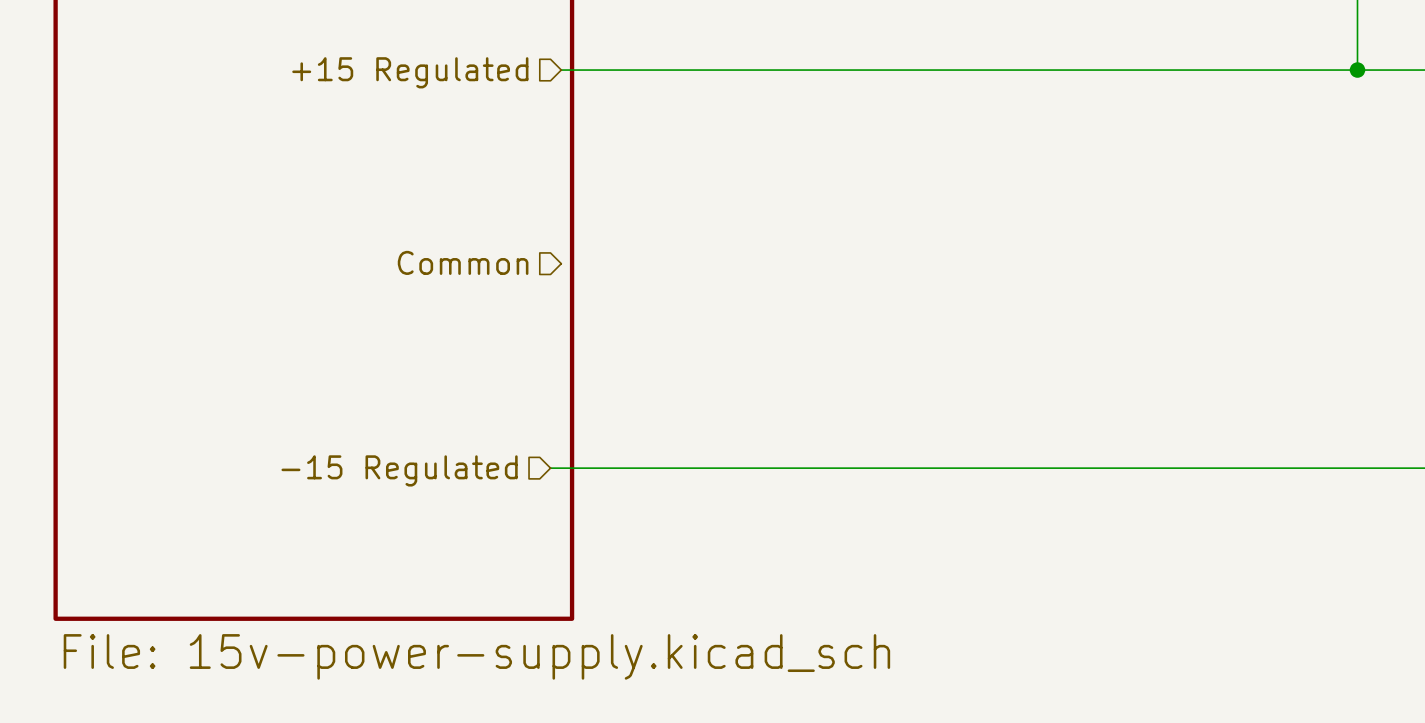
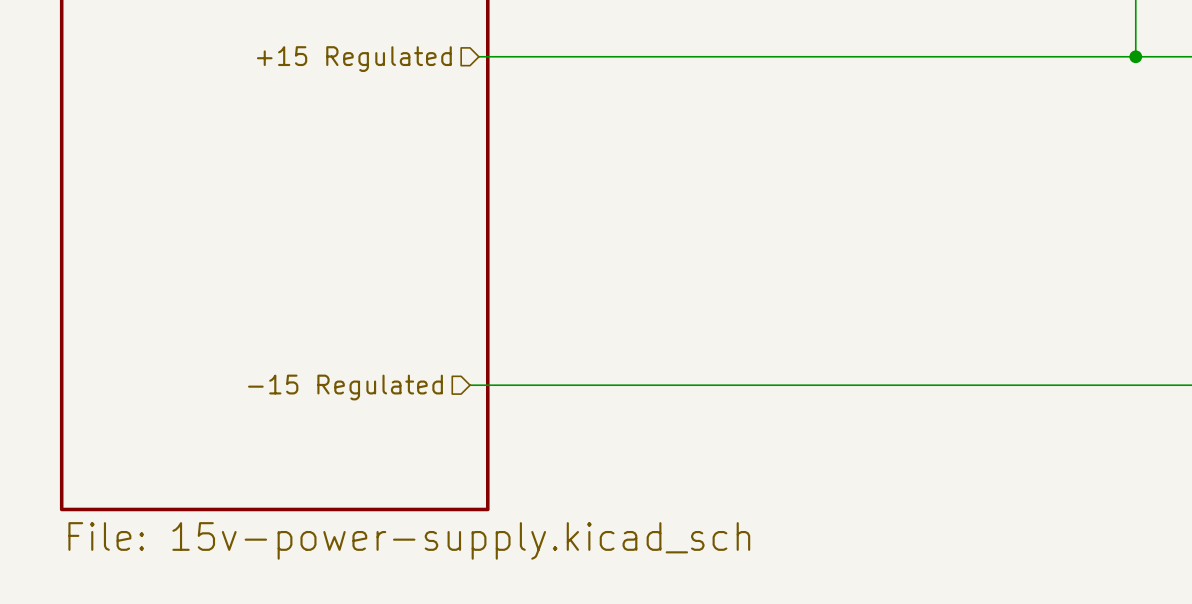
hierarchical label: Common (463, 262) -> none

